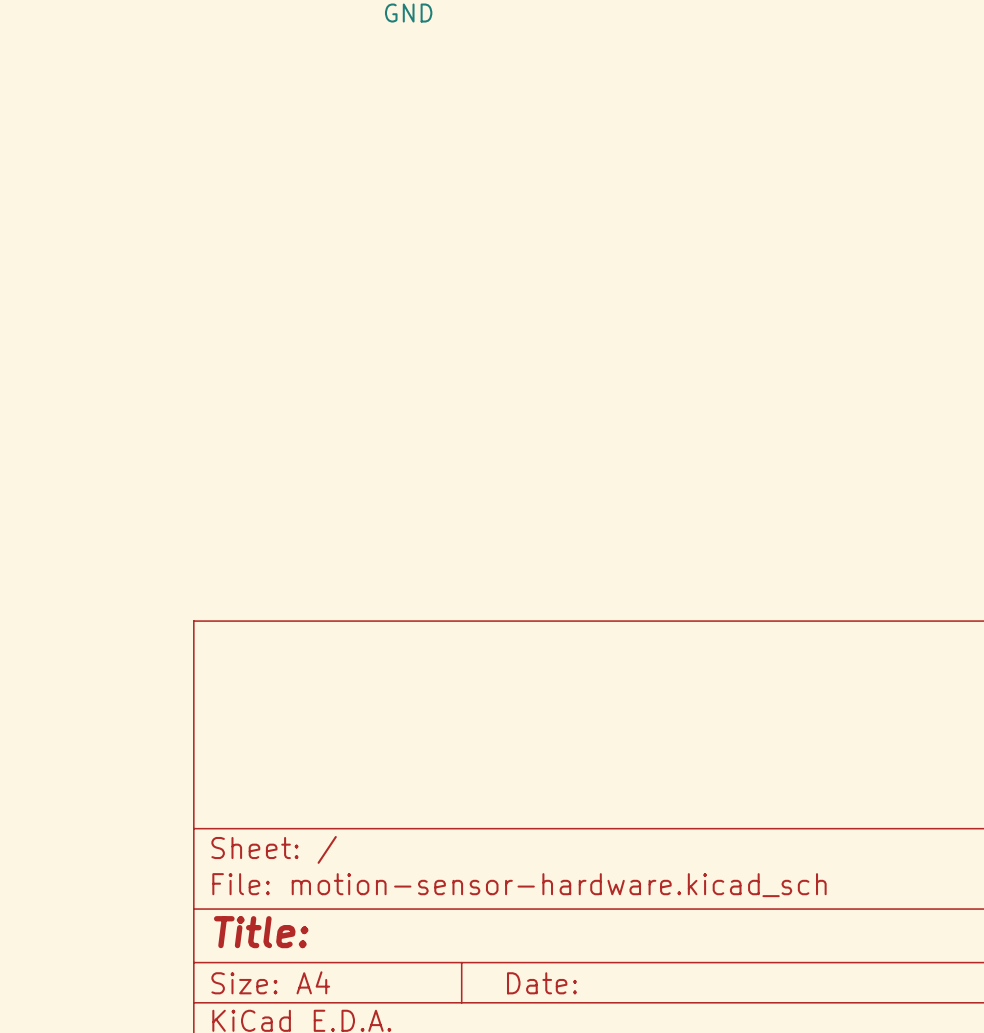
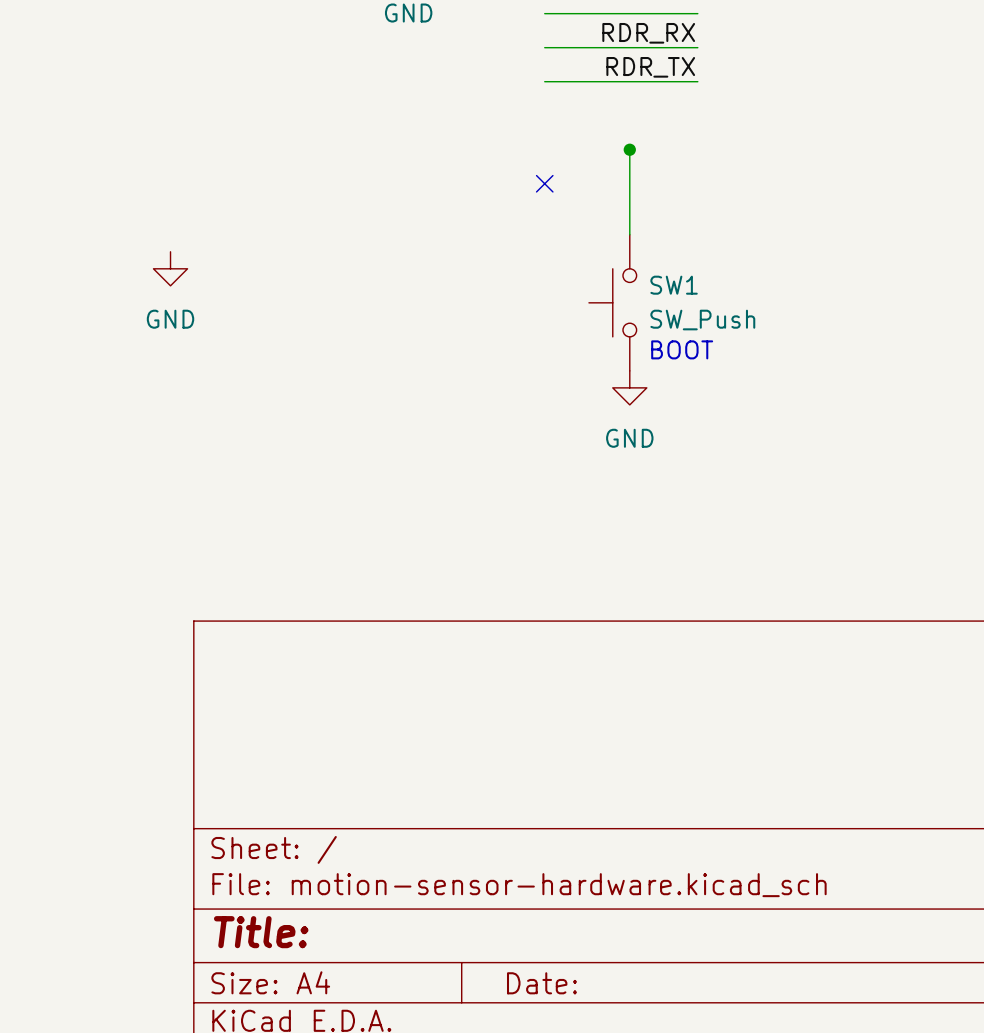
wire: none -> (544, 13) (697, 13)
label: none -> RDR_RX (648, 33)
wire: none -> (544, 47) (697, 47)
label: none -> RDR_TX (650, 67)
wire: none -> (544, 81) (697, 81)
wire: none -> (629, 149) (629, 234)
junction: none -> (629, 149)
no-connect mark: none -> (544, 183)
power symbol: none -> GND (170, 268)
SW1: none -> SW_Push (612, 302)
text: none -> BOOT (682, 349)
power symbol: none -> GND (629, 387)

